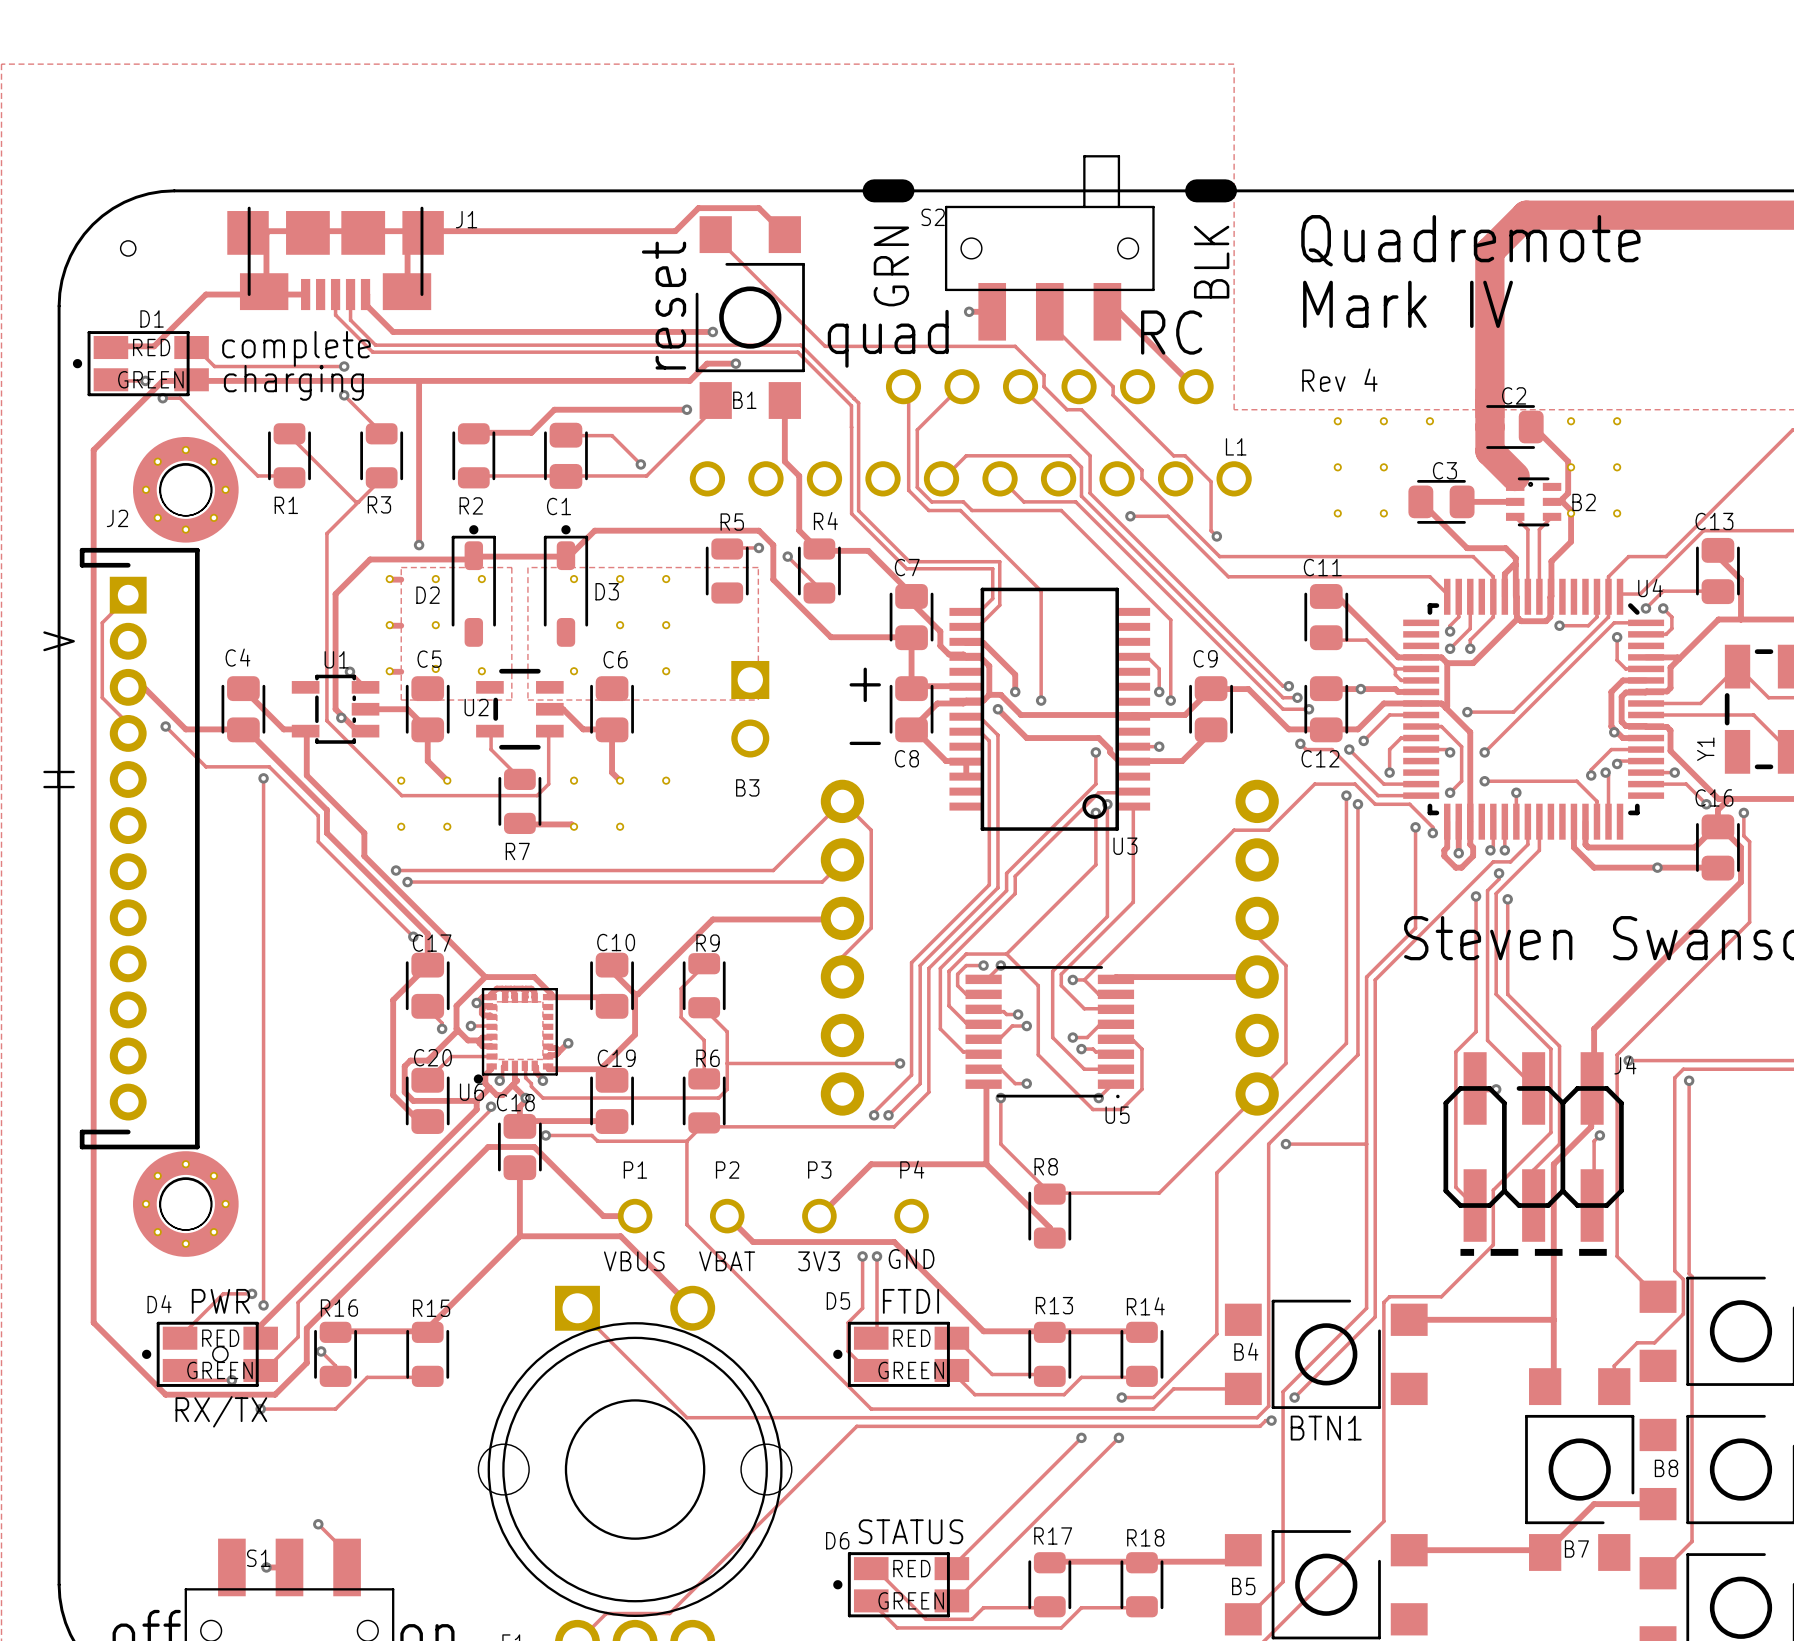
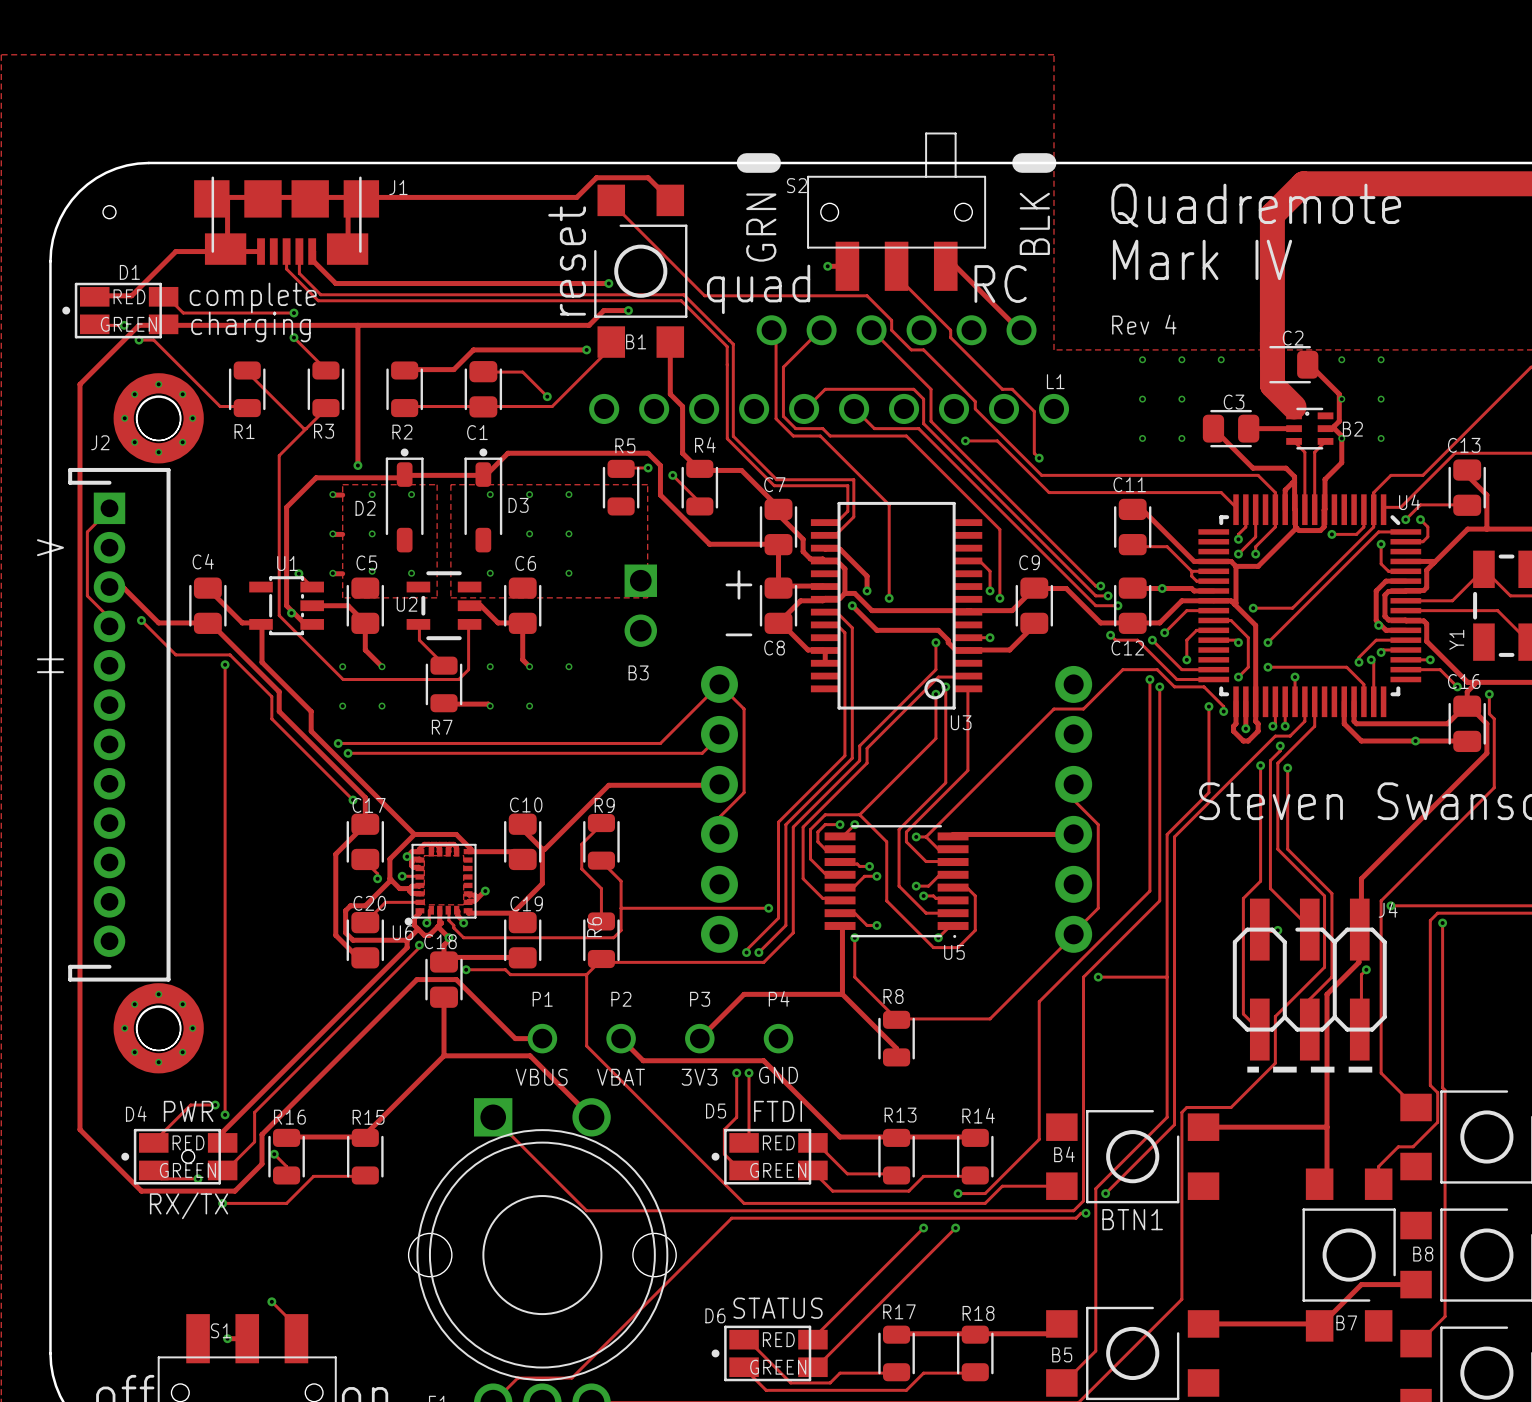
R6 name rotation: 0° (708, 1058) -> 90° counterclockwise (594, 927)

